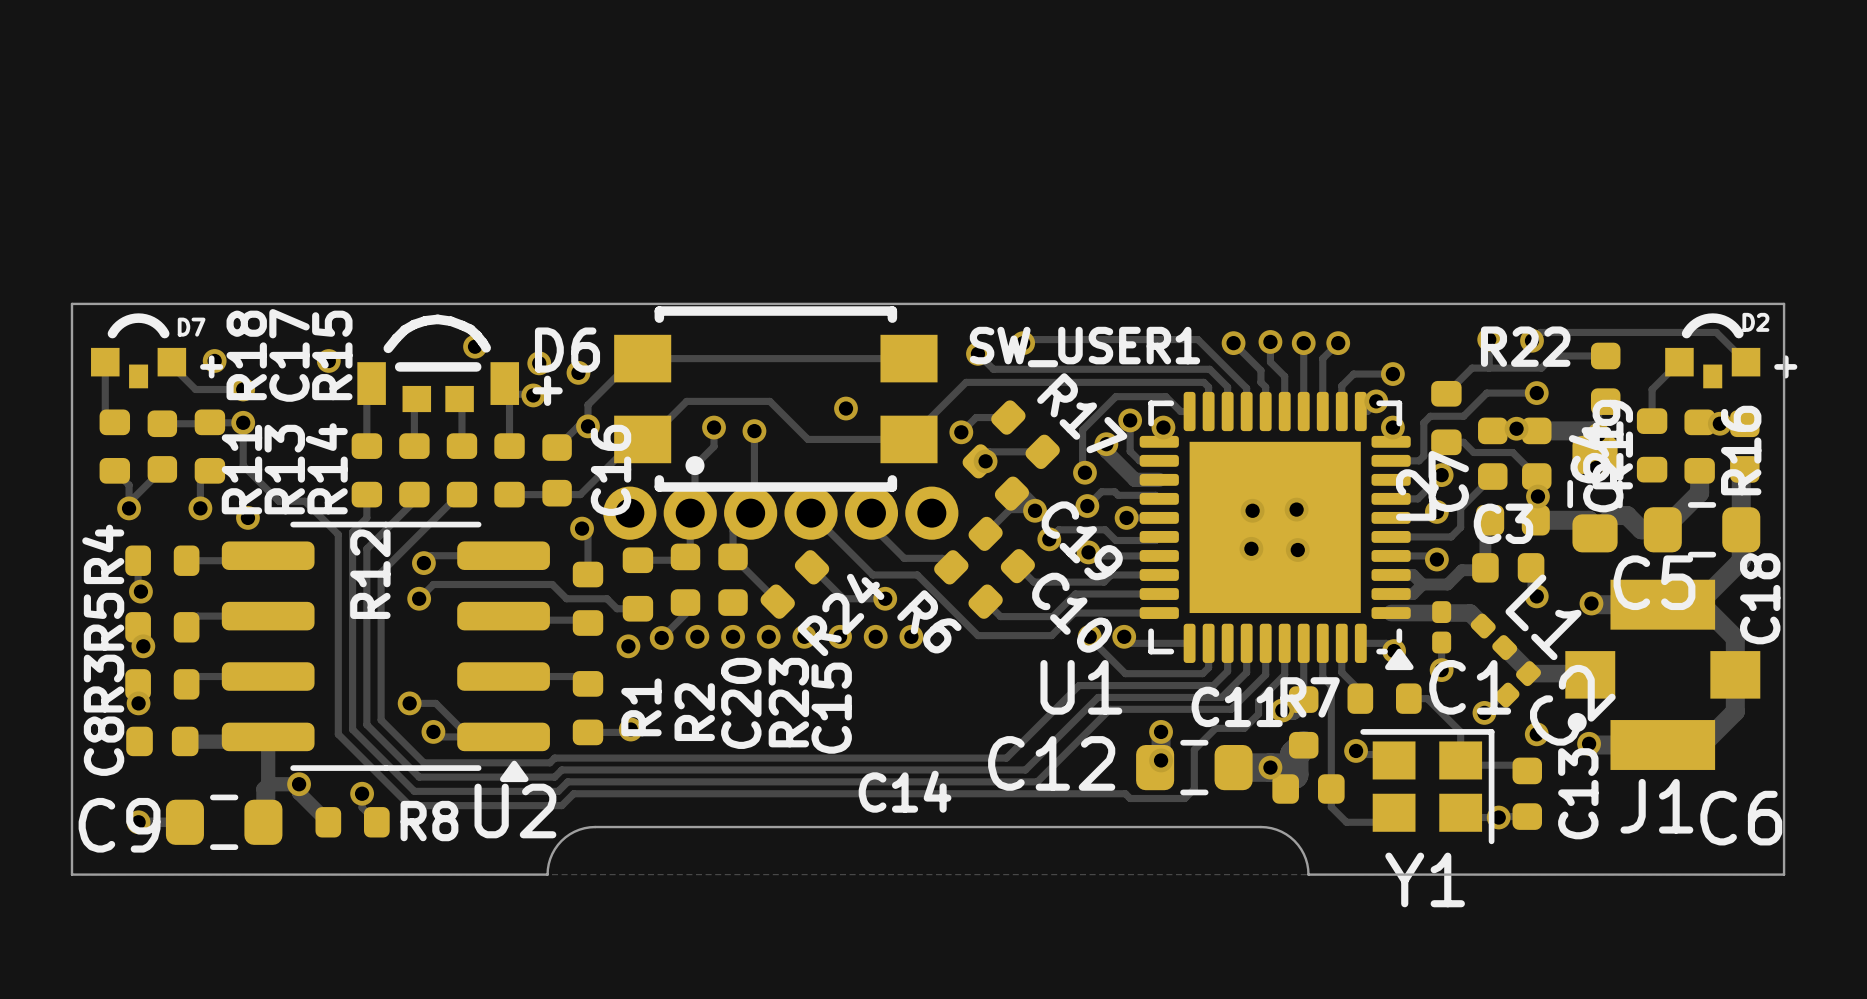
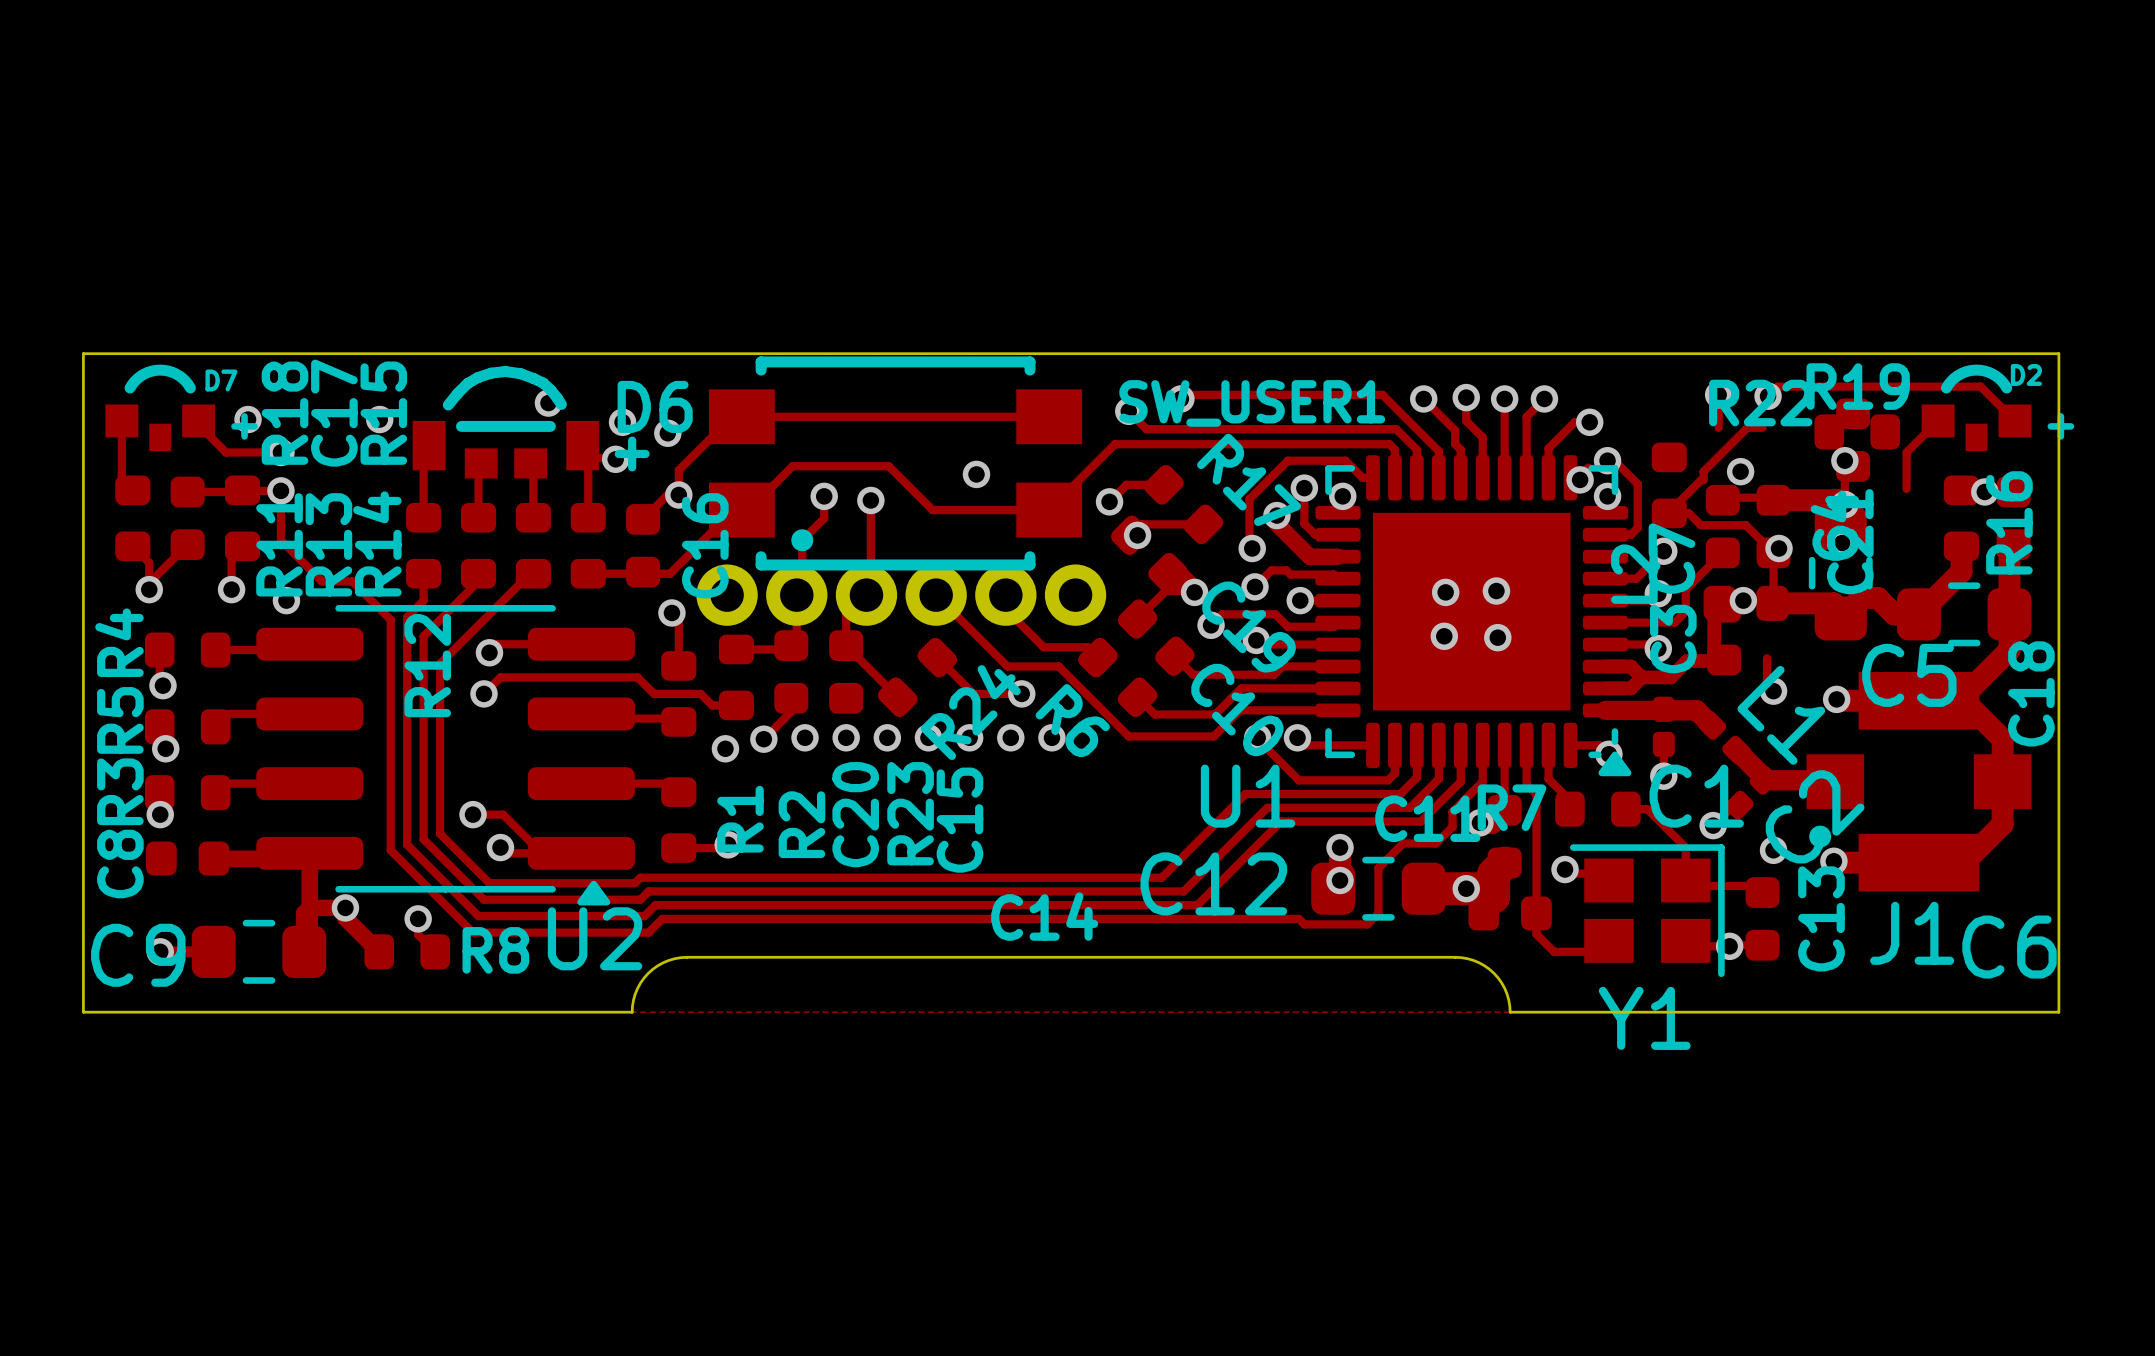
track: (1605, 355) (1553, 355) (1541, 368) (1527, 368) -> none
via: none -> (1589, 422)
track: (1514, 368) (1472, 368) (1446, 393) -> (1747, 427) (1703, 471) (1703, 479) (1670, 510)
track: (1353, 374) (1392, 374) -> (1562, 434) (1574, 422) (1589, 422)
via: (1392, 374) -> none
track: (1536, 393) (1486, 393) (1463, 416) (1430, 416) (1423, 422) (1423, 456) (1419, 460) (1413, 460) -> (1607, 460) (1614, 460) (1637, 484) (1637, 527) (1630, 534)
via: (1536, 393) -> none
via: none -> (1607, 460)
via: none -> (1844, 460)
via: (1376, 401) -> none
via: none -> (1580, 479)
via position: (1516, 428) -> (1740, 471)
R19 rotation: 0° (1652, 445) -> 90° clockwise (1857, 431)
R19 position: (1652, 445) -> (1857, 431)
via position: (1537, 496) -> (1779, 548)
via: none -> (1743, 600)
C3 rotation: 0° (1508, 567) -> 90° clockwise (1724, 633)

